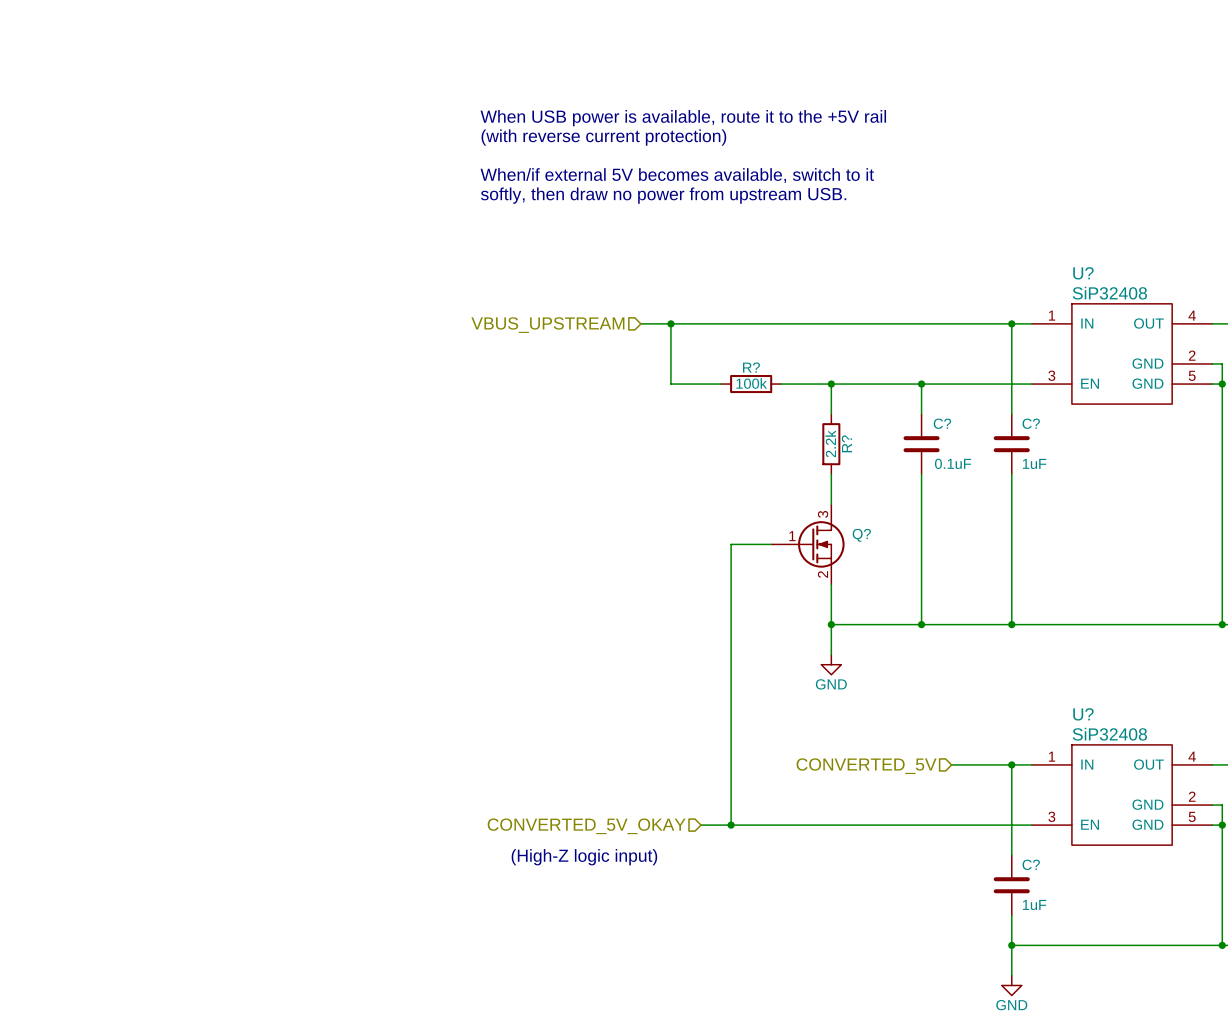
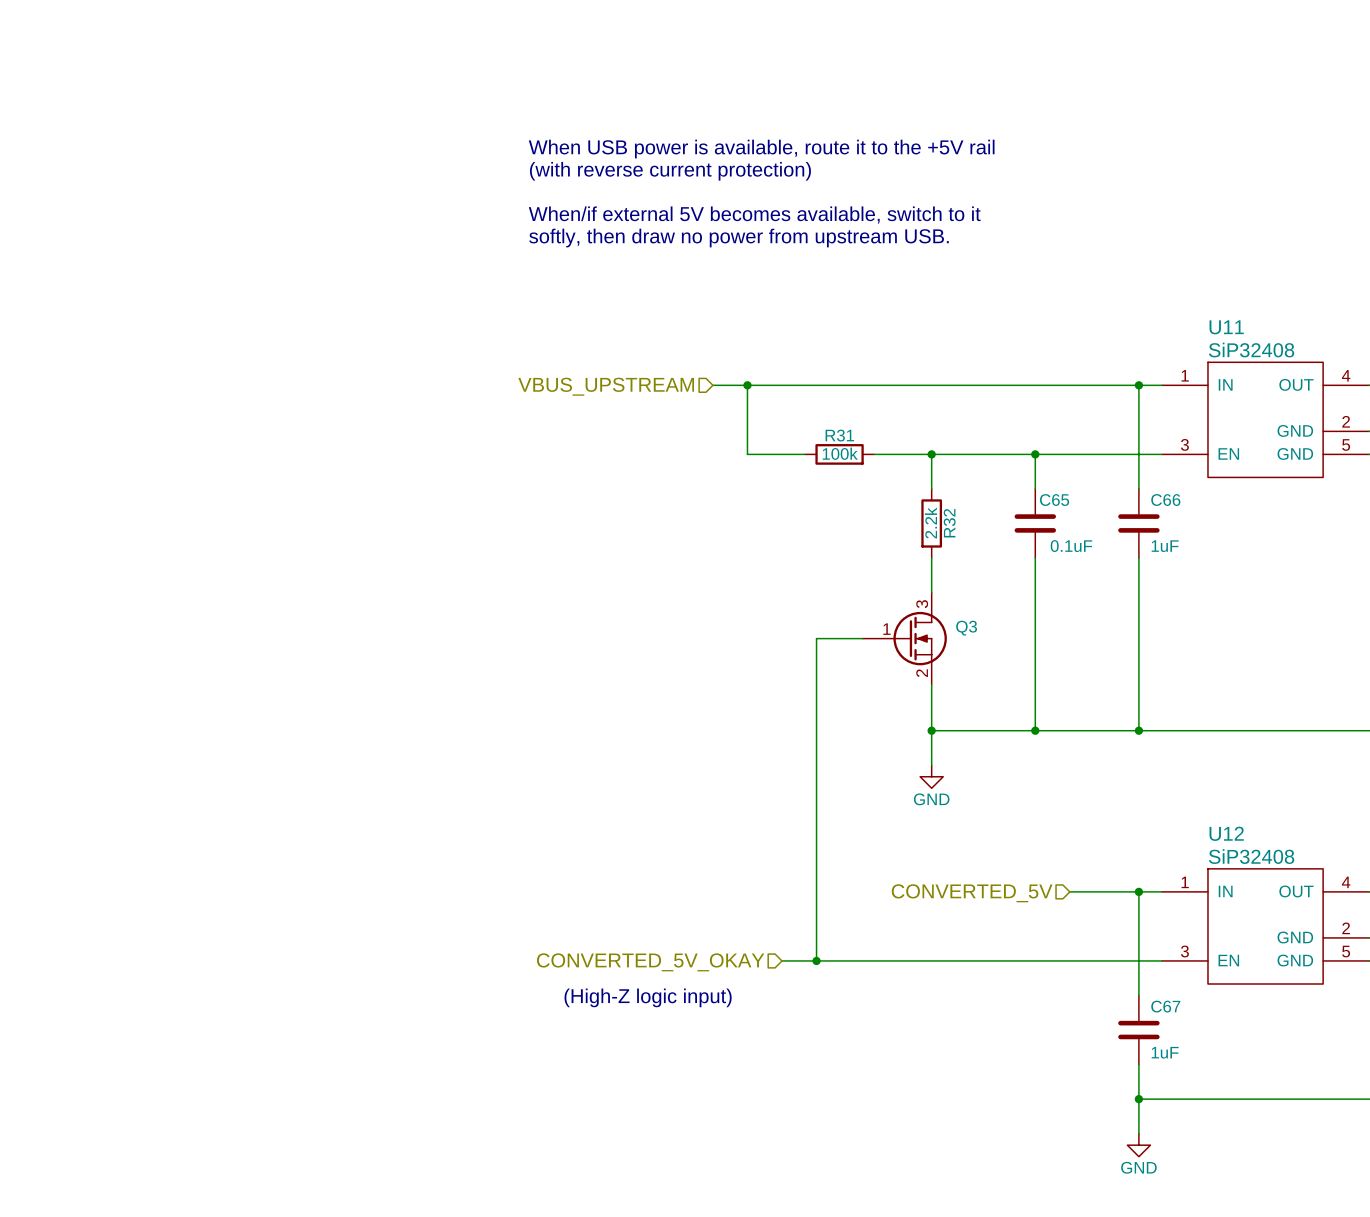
U? name: U? (1083, 273) -> U11 (1226, 327)
R? name: R? (751, 367) -> R31 (839, 435)
C? name: C? (942, 423) -> C65 (1054, 500)
C? name: C? (1031, 423) -> C66 (1165, 500)
R? name: R? (846, 443) -> R32 (949, 523)
Q? name: Q? (861, 535) -> Q3 (966, 628)
U? name: U? (1083, 714) -> U12 (1226, 833)
C? name: C? (1031, 864) -> C67 (1165, 1006)

